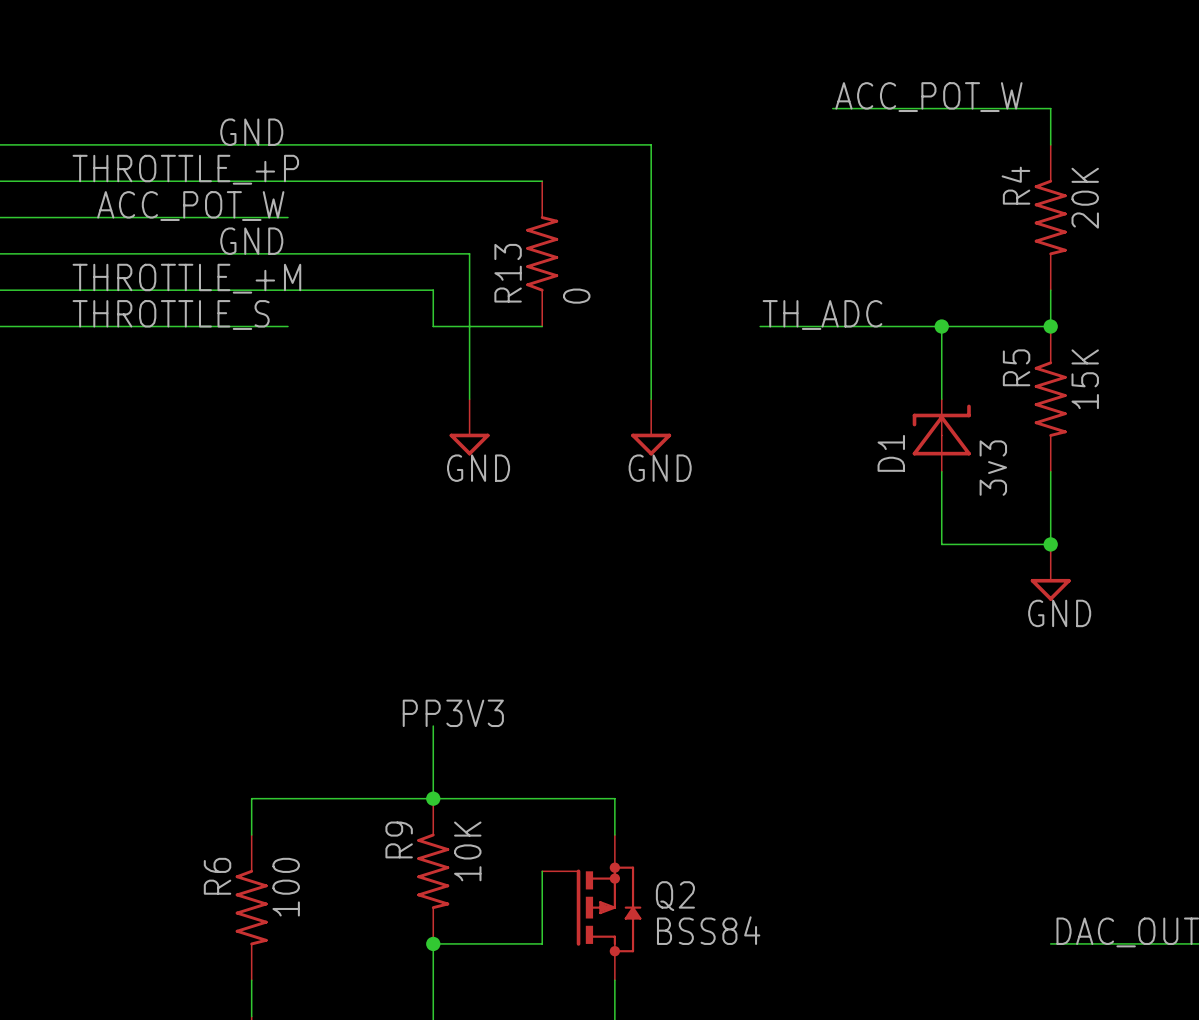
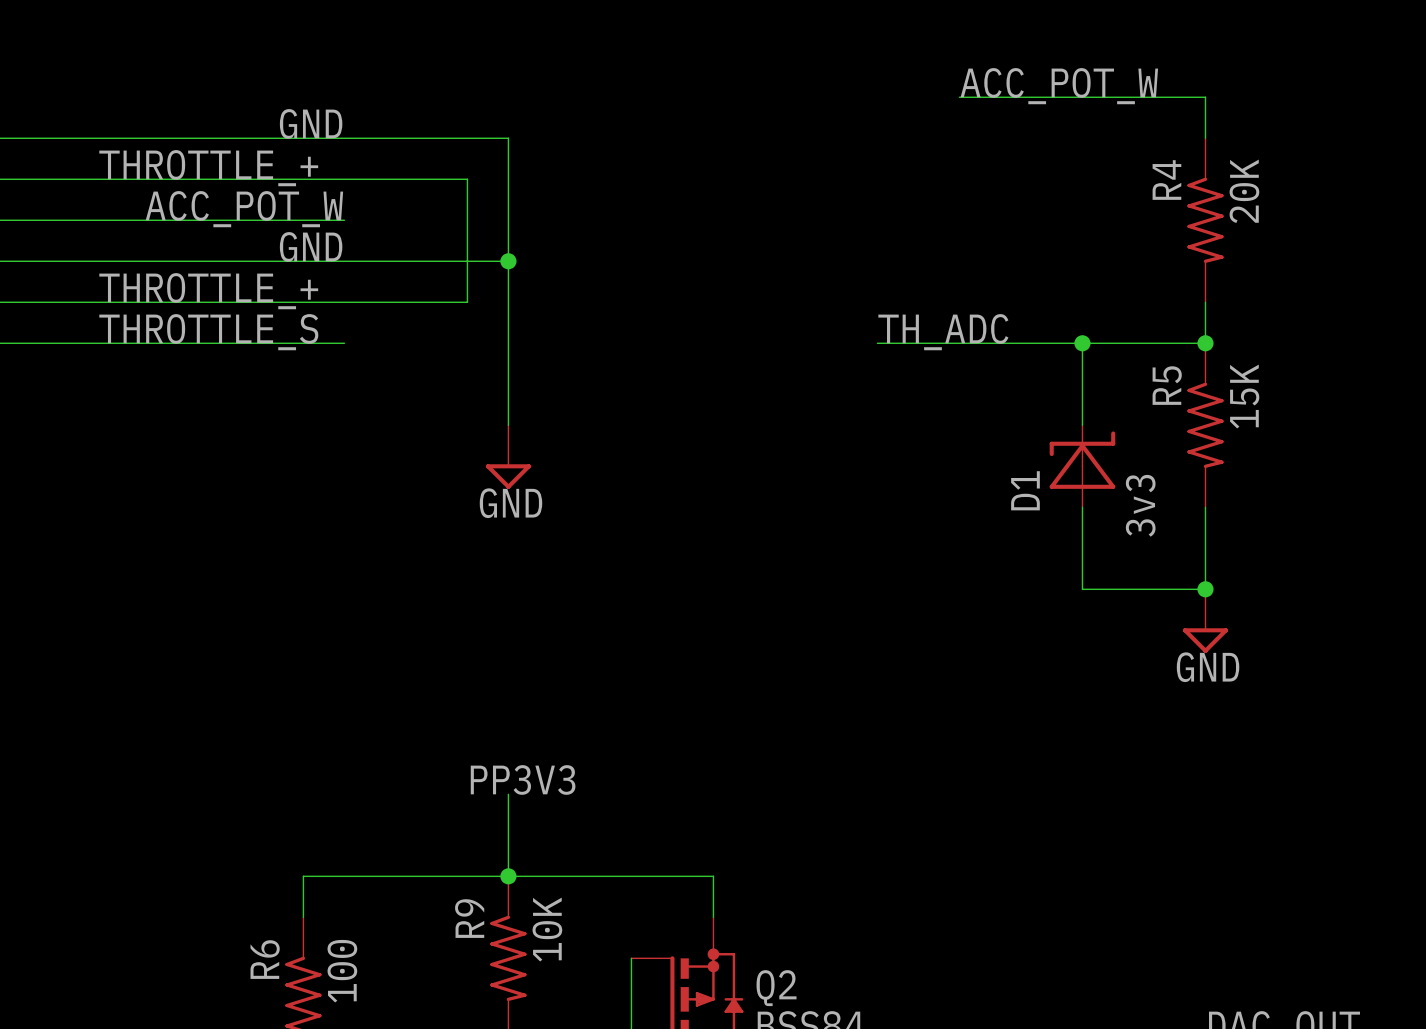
wire: (433, 144) (651, 144) (651, 399) -> (508, 138) (508, 302)
label: THROTTLE_+P (185, 169) -> THROTTLE_+ (208, 168)
wire: (396, 181) (542, 181) -> none
wire: (433, 253) (469, 253) (469, 399) -> none
junction: none -> (508, 261)
R13: 0 (542, 253) -> none
label: THROTTLE_+M (186, 278) -> THROTTLE_+ (208, 291)
wire: (396, 290) (433, 290) -> (467, 302) (467, 179)
wire: (433, 326) (542, 326) -> (508, 343) (508, 425)
power symbol position: GND (469, 427) -> GND (508, 457)
power symbol: GND (651, 427) -> none

